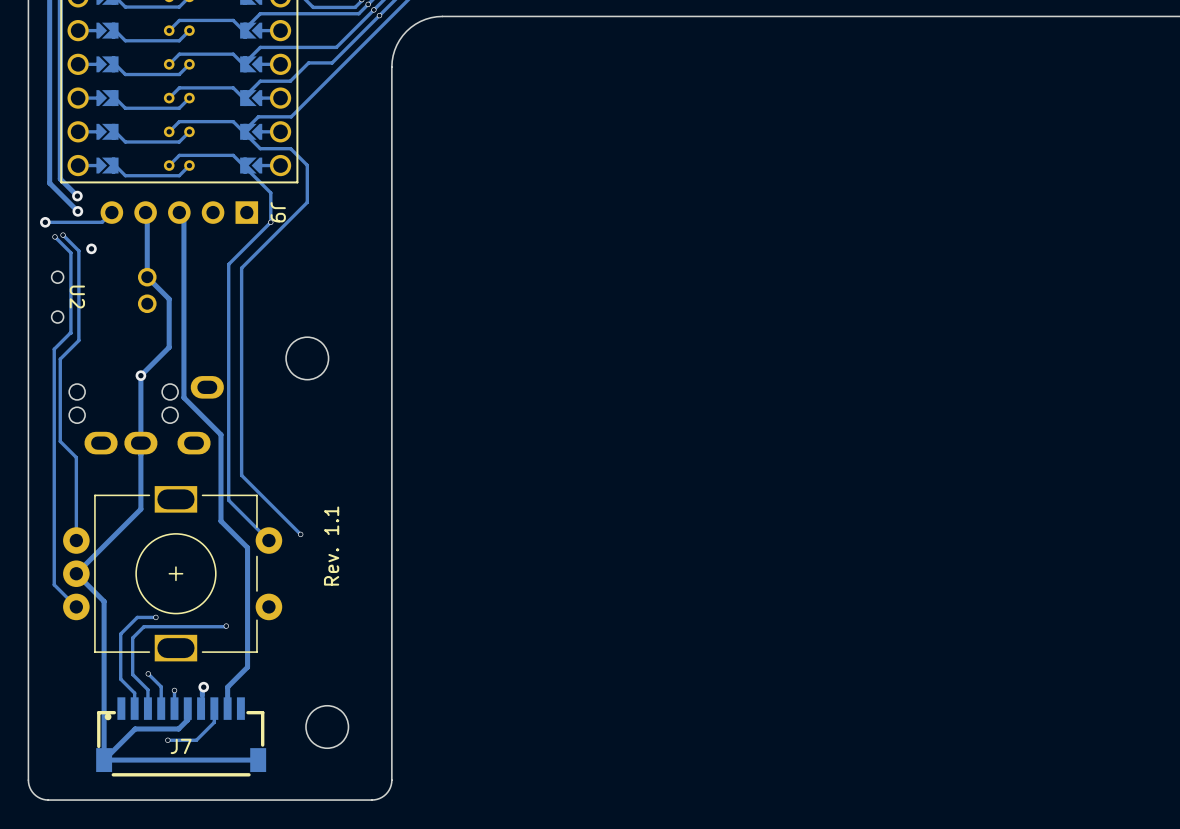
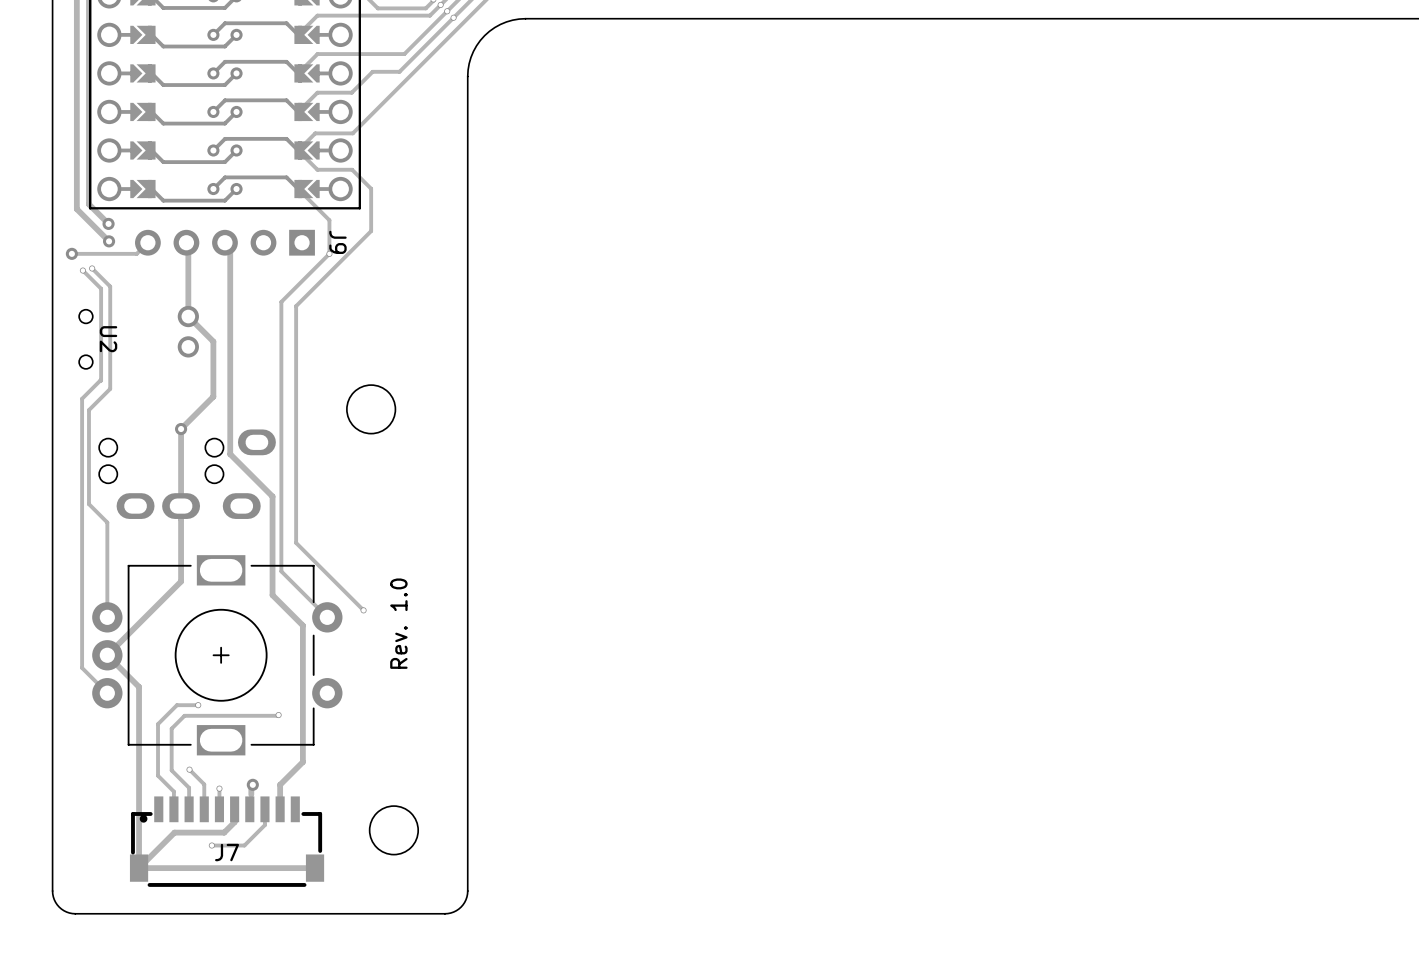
via: (91, 248) -> none
text: Rev. 1.1 (331, 546) -> Rev. 1.0 (398, 623)

